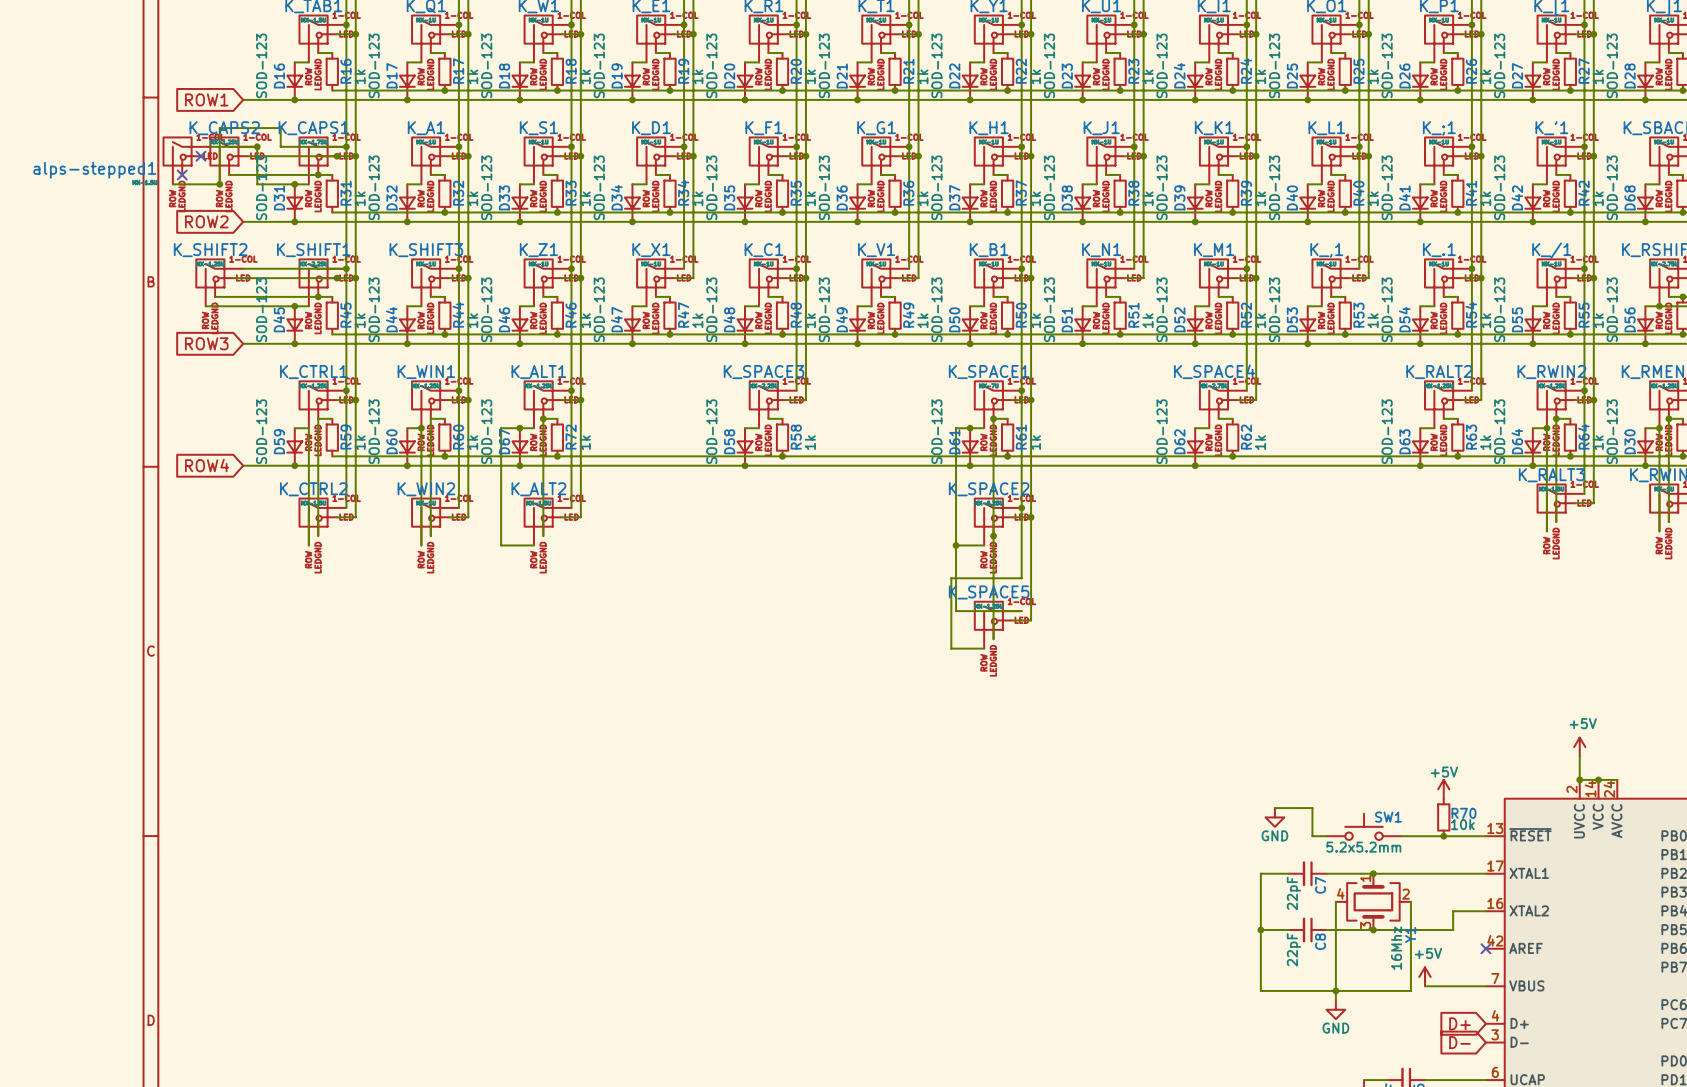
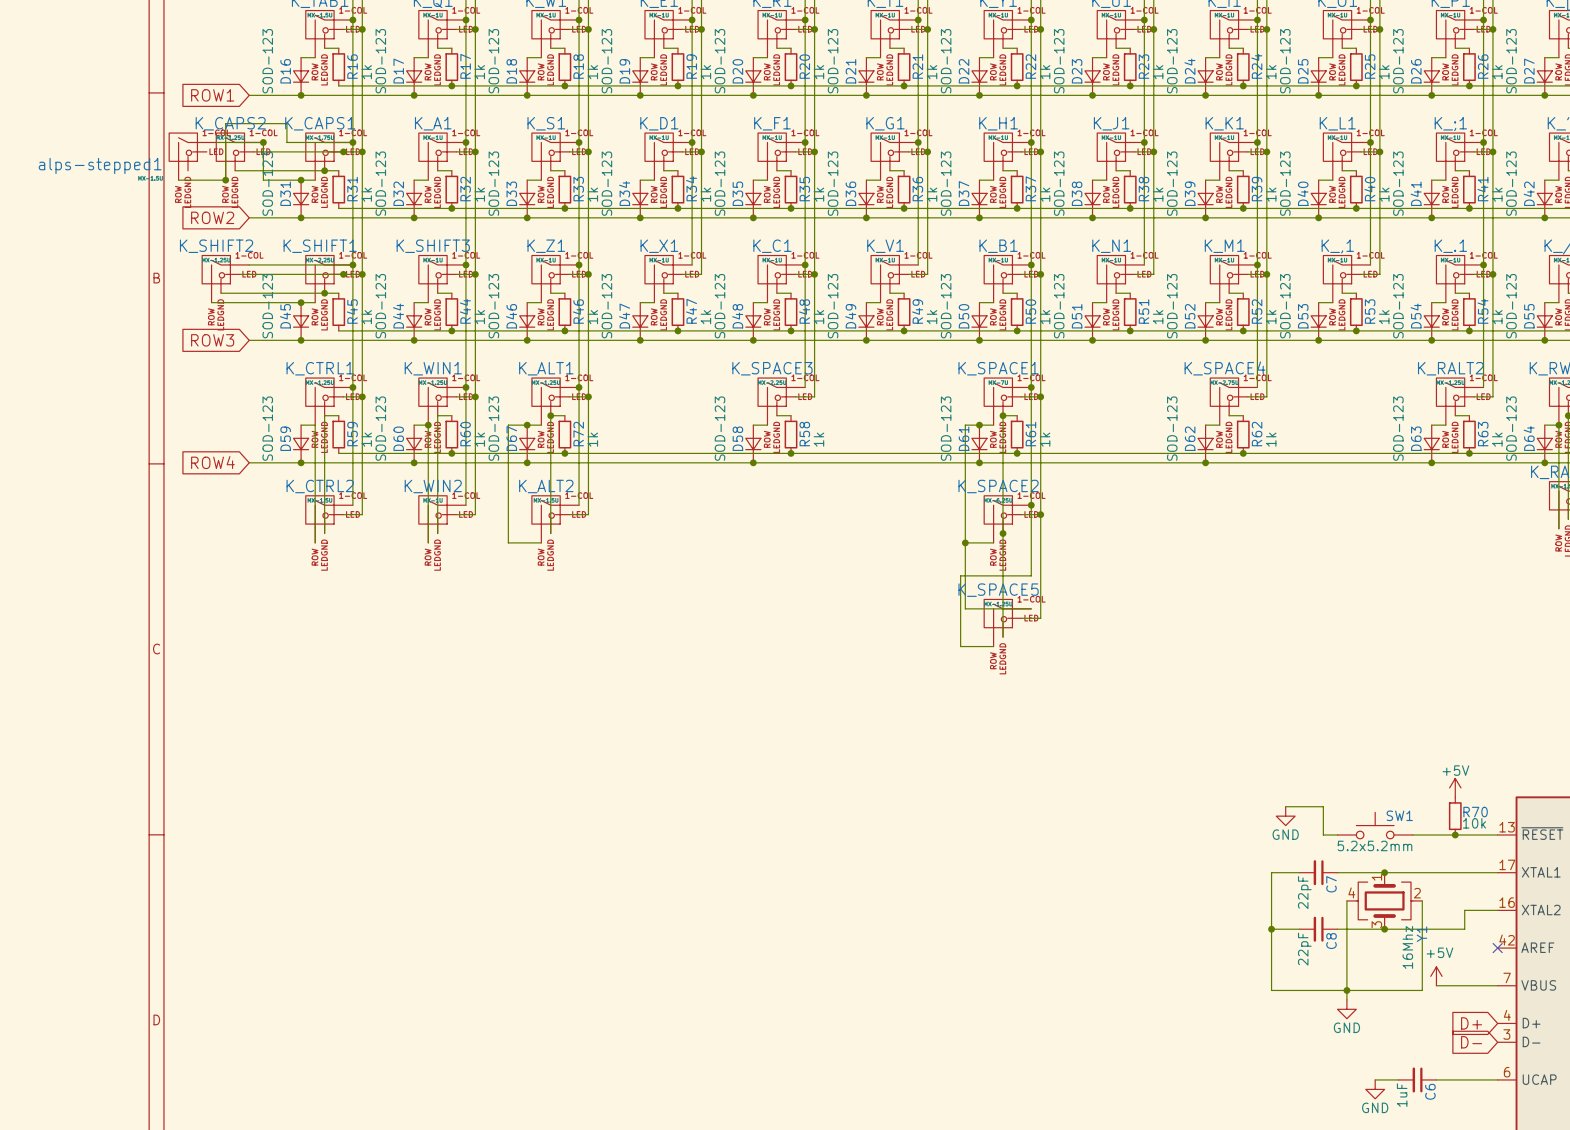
no-connect mark: (201, 156) -> none
no-connect mark: (182, 174) -> none

